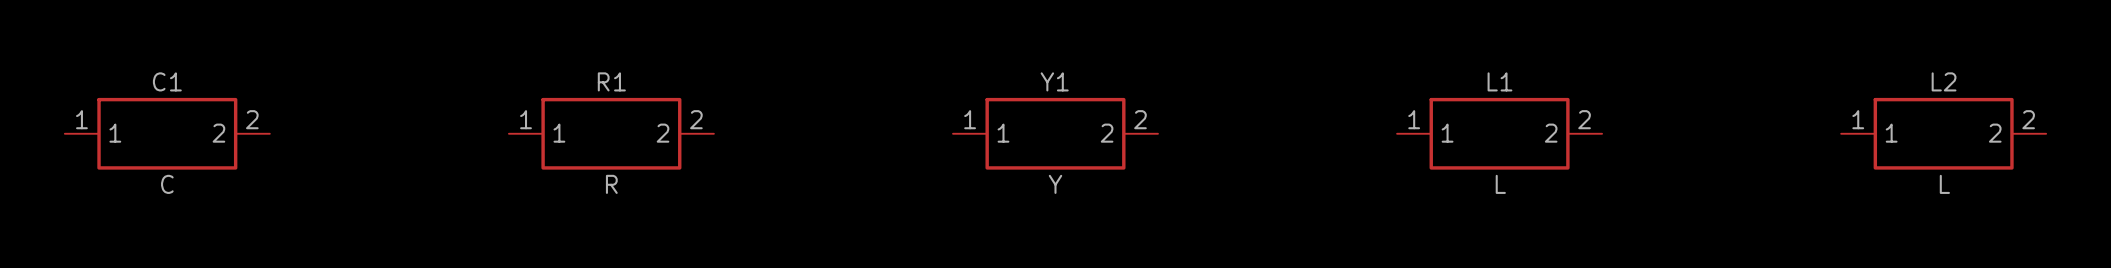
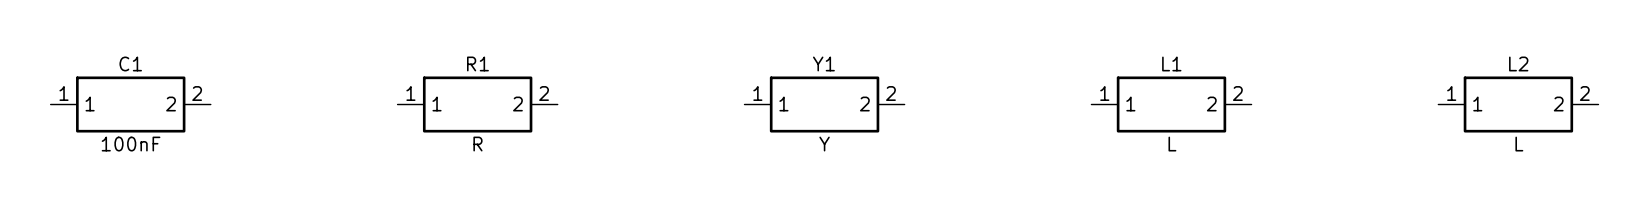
C1 value: C (167, 184) -> 100nF (131, 144)

